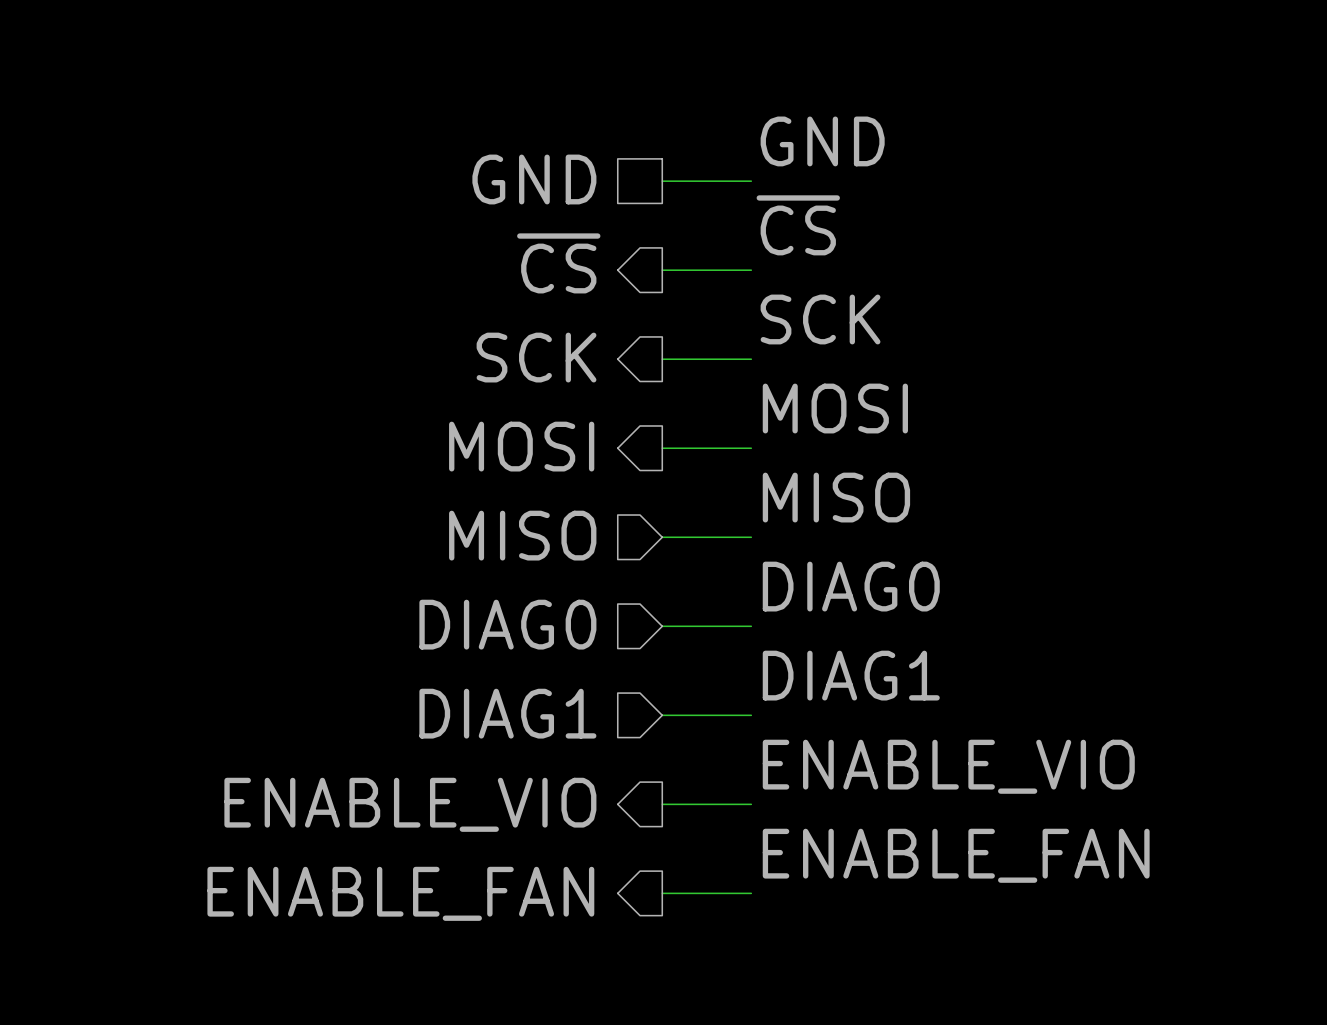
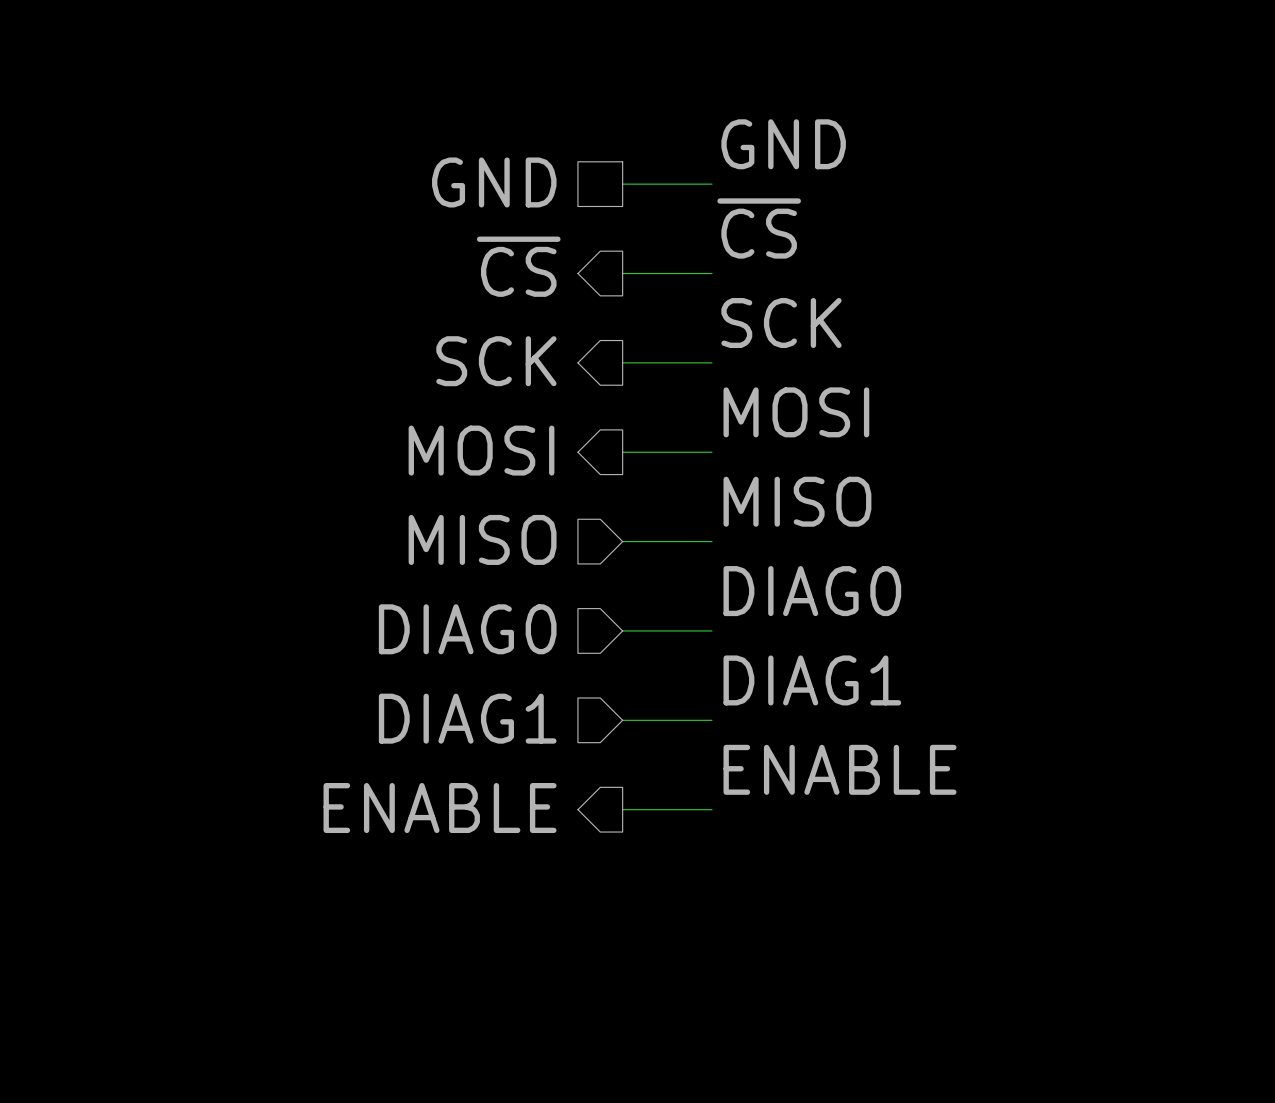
label: ENABLE_VIO (948, 766) -> ENABLE (840, 769)
hierarchical label: ENABLE_VIO (410, 804) -> ENABLE (440, 808)
label: ENABLE_FAN (956, 855) -> none
hierarchical label: ENABLE_FAN (400, 893) -> none
wire: (662, 893) (751, 893) -> none

